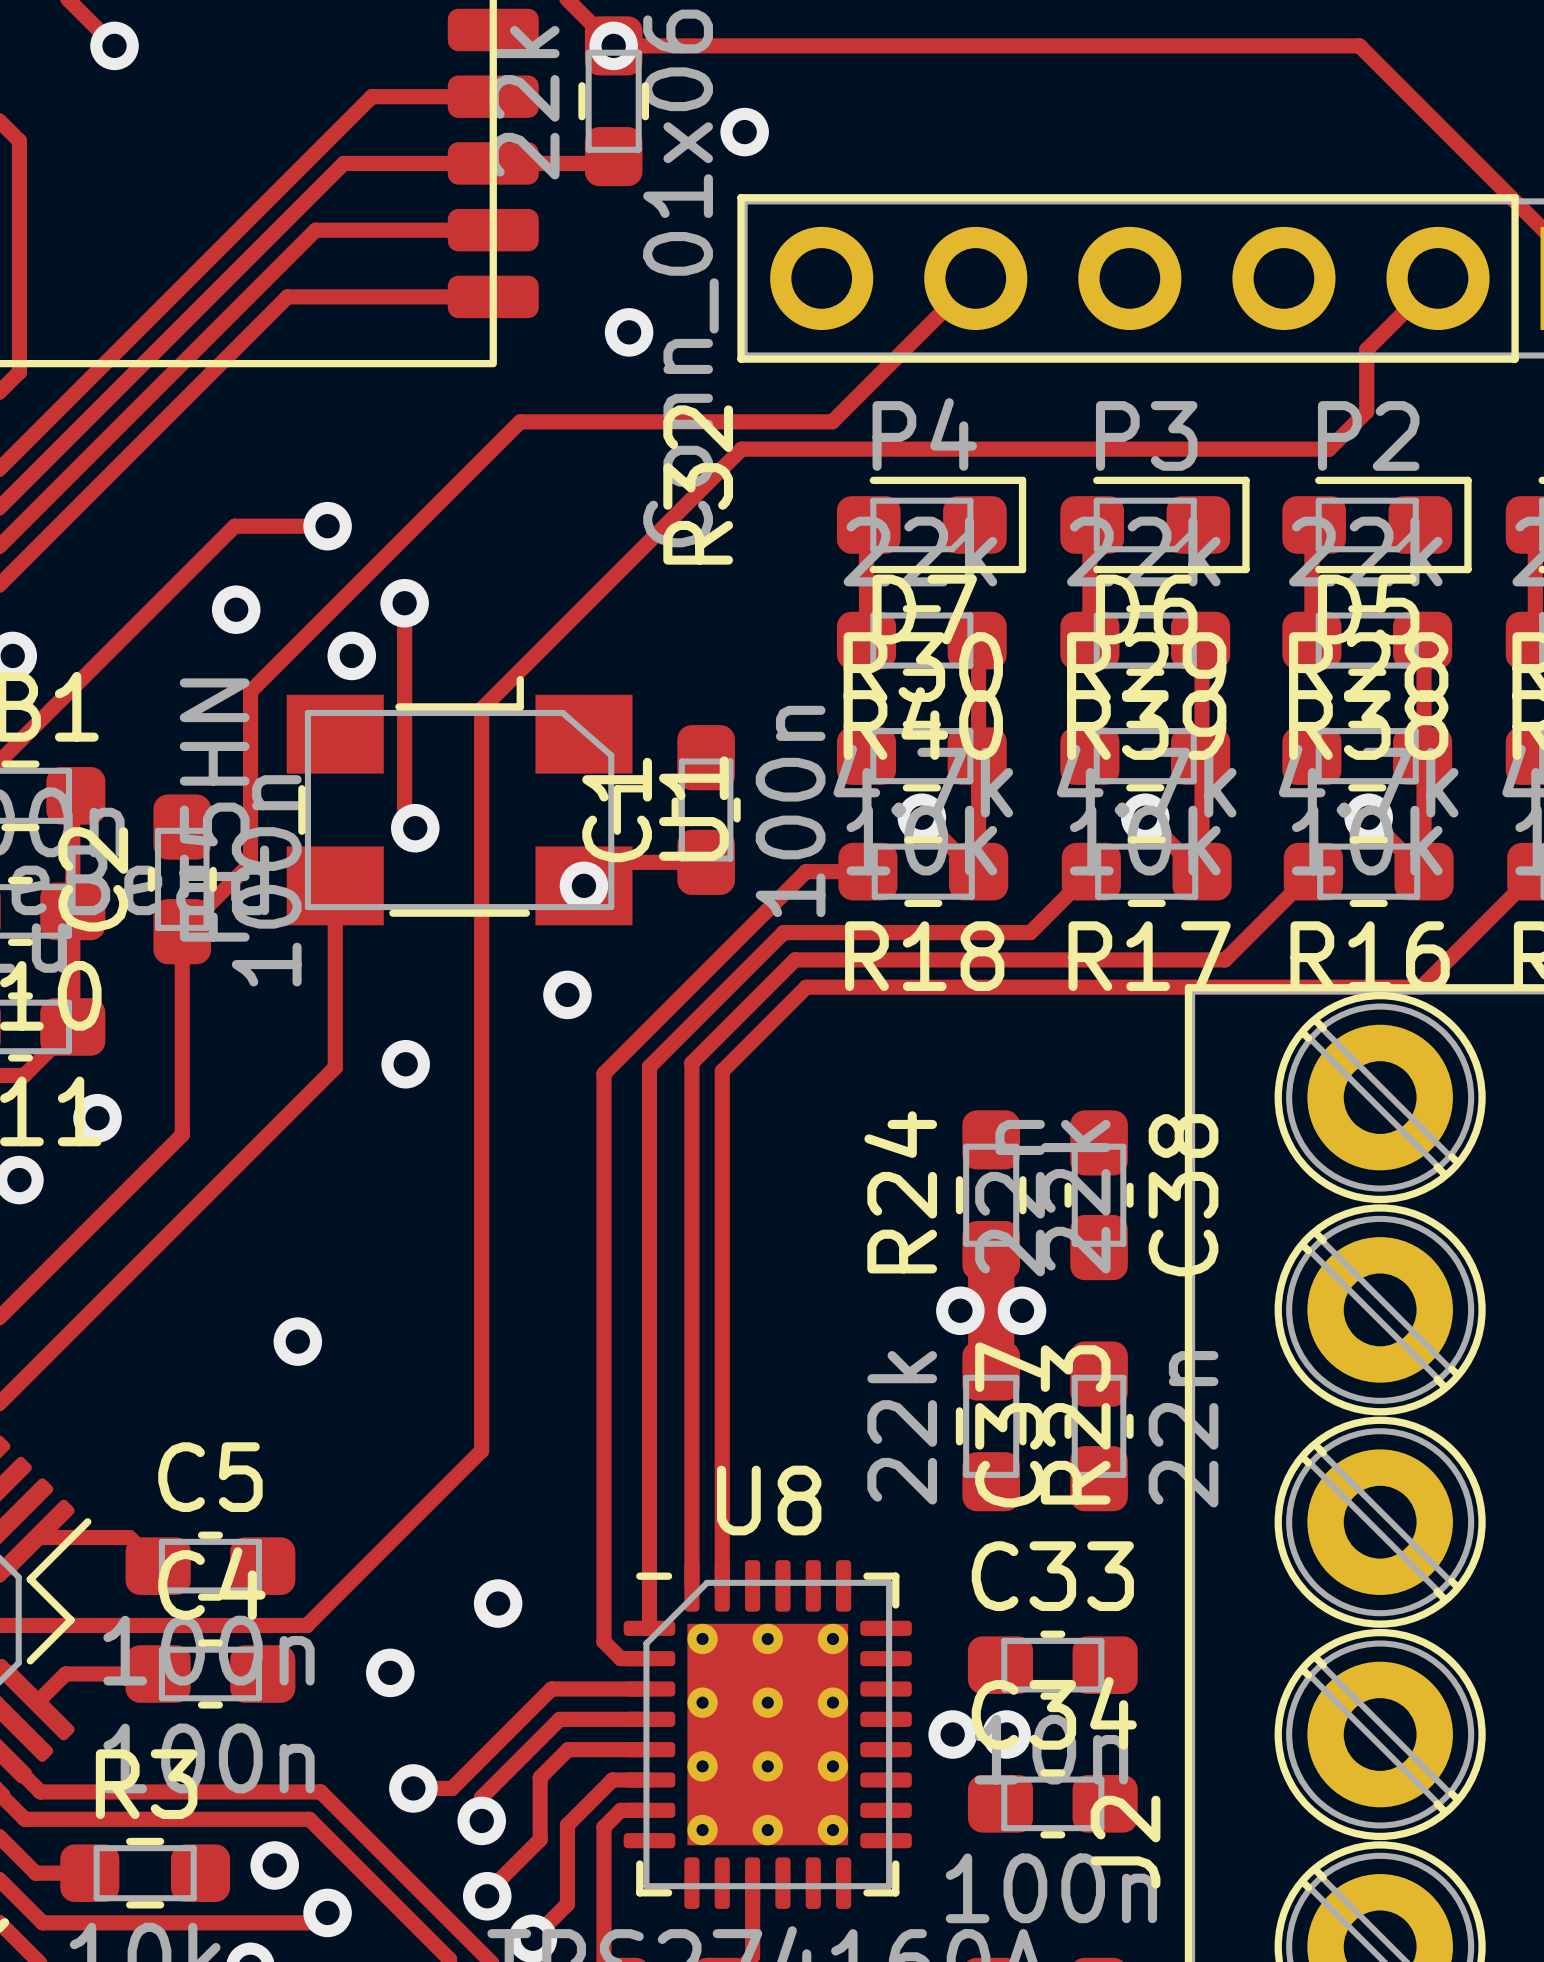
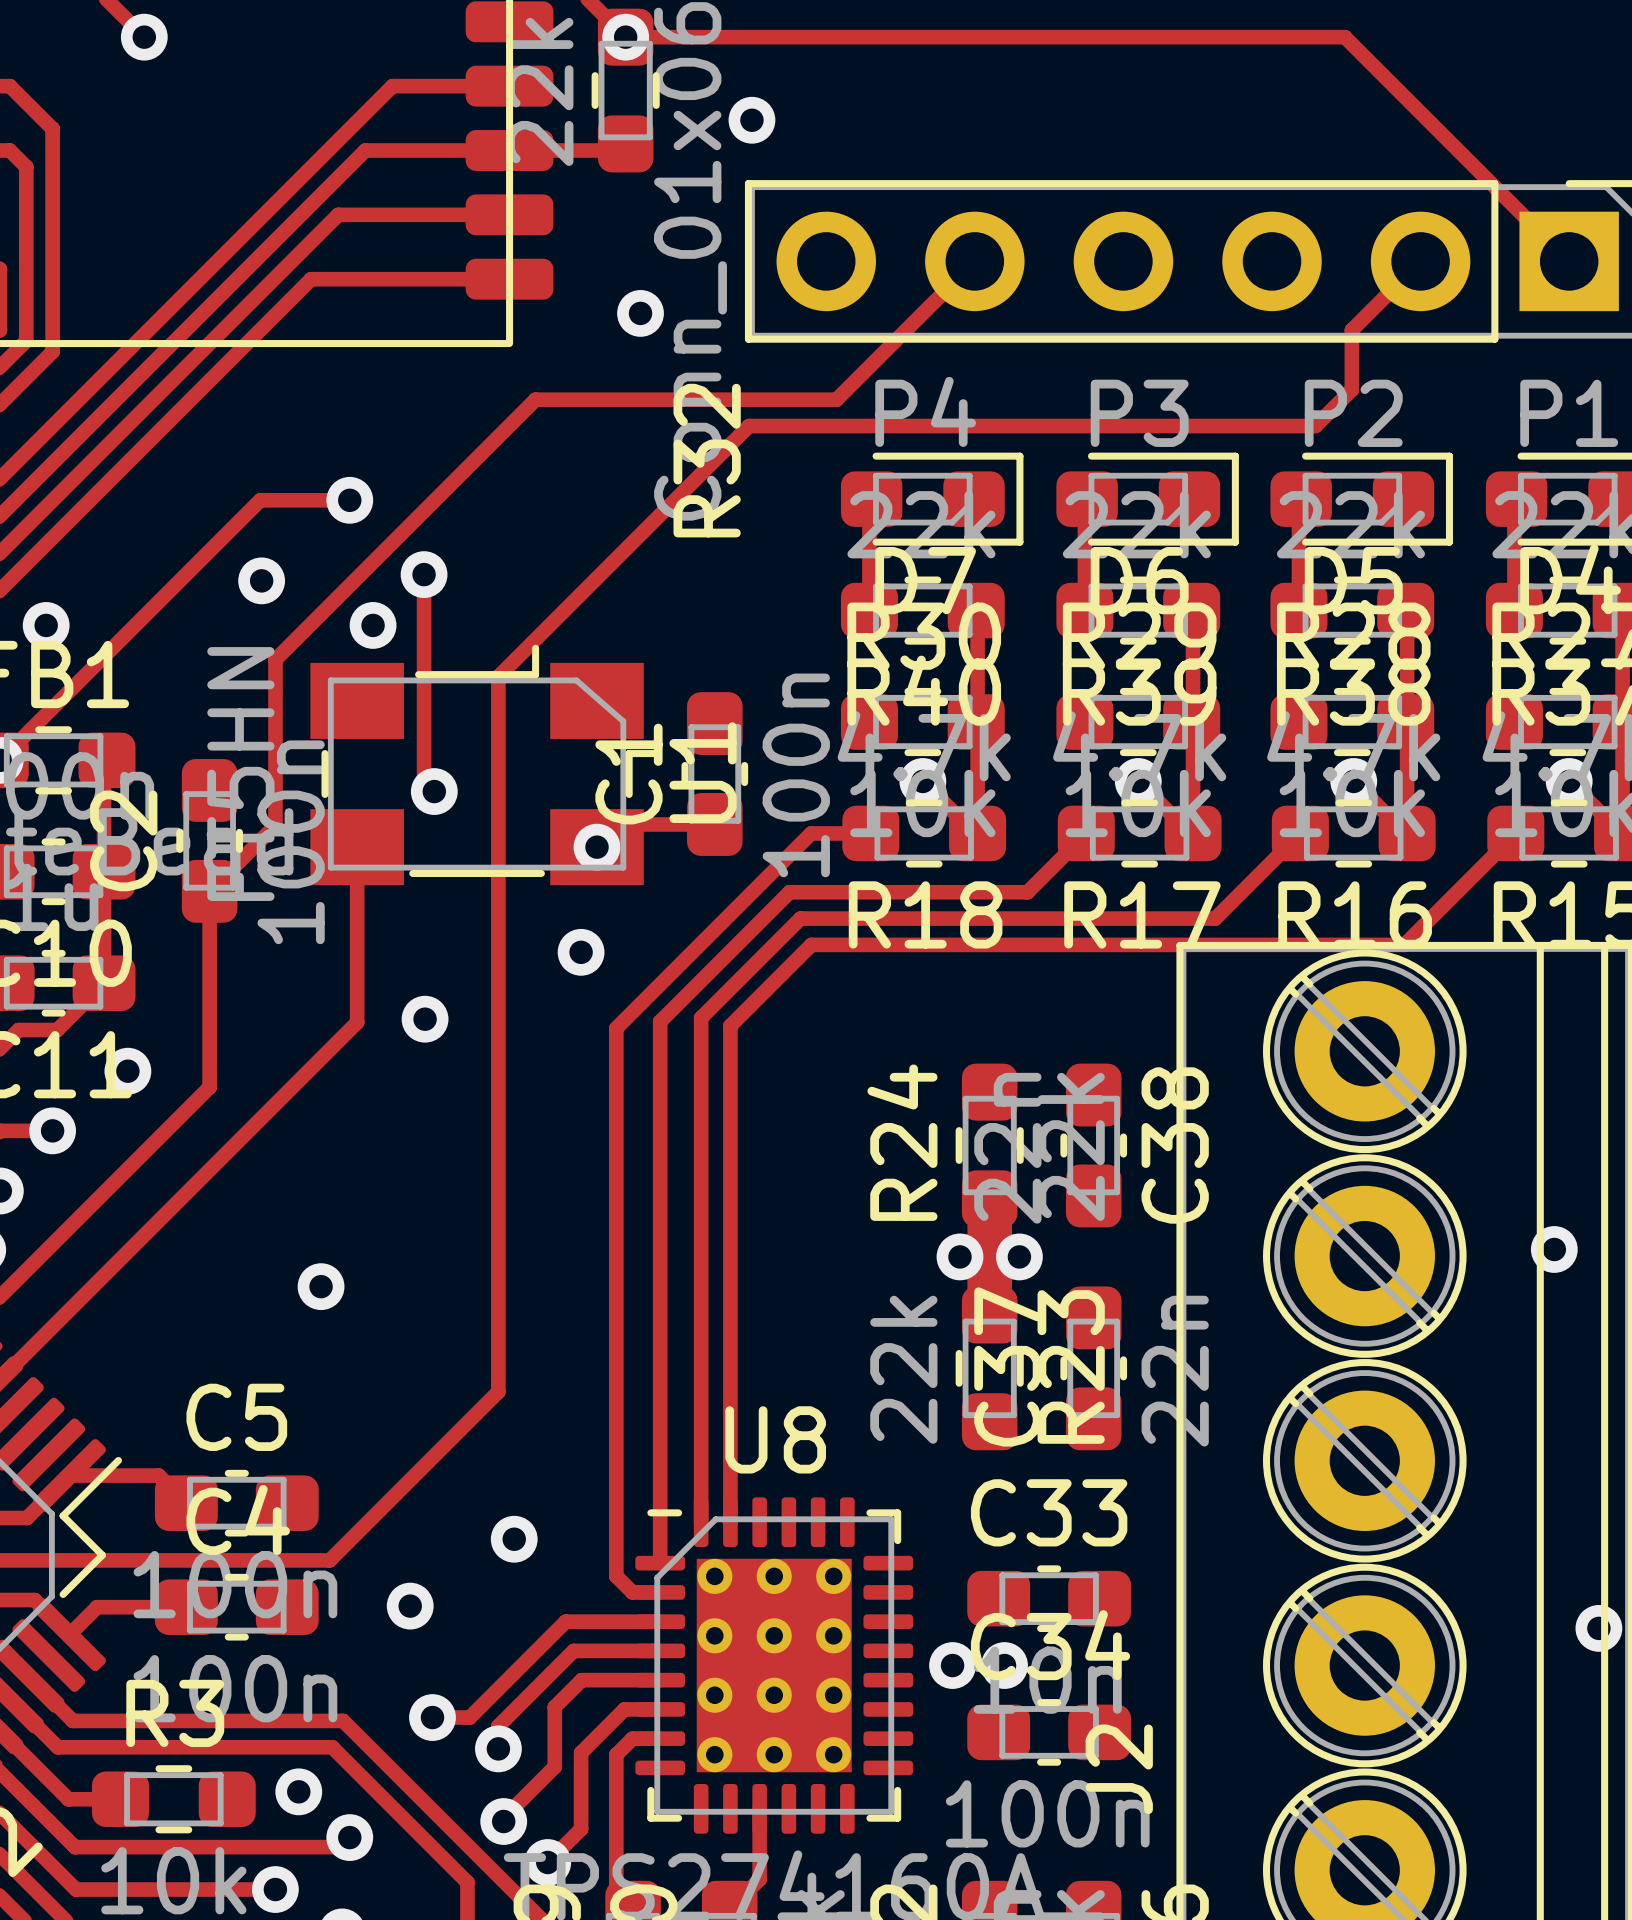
U8 footprint: [623, 1560, 912, 1909] -> [635, 1497, 914, 1834]

